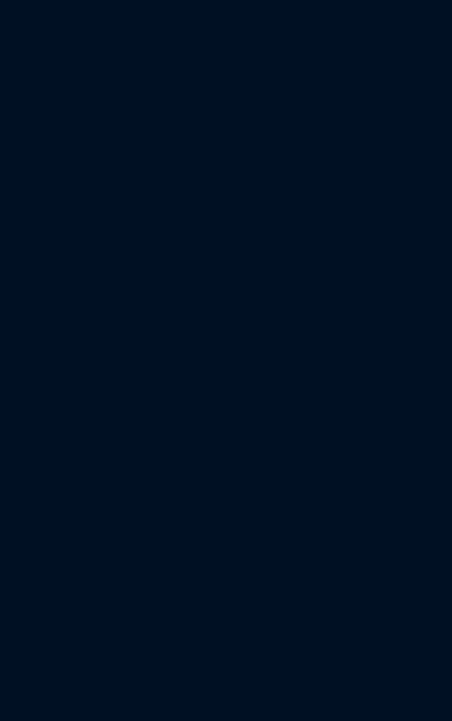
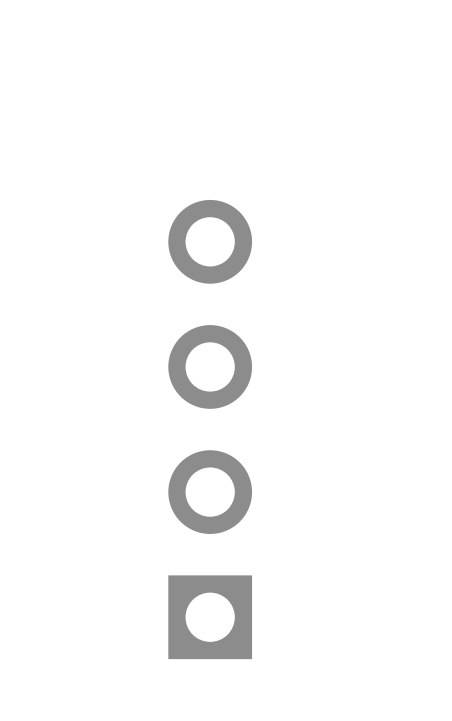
part: none -> (210, 429)

